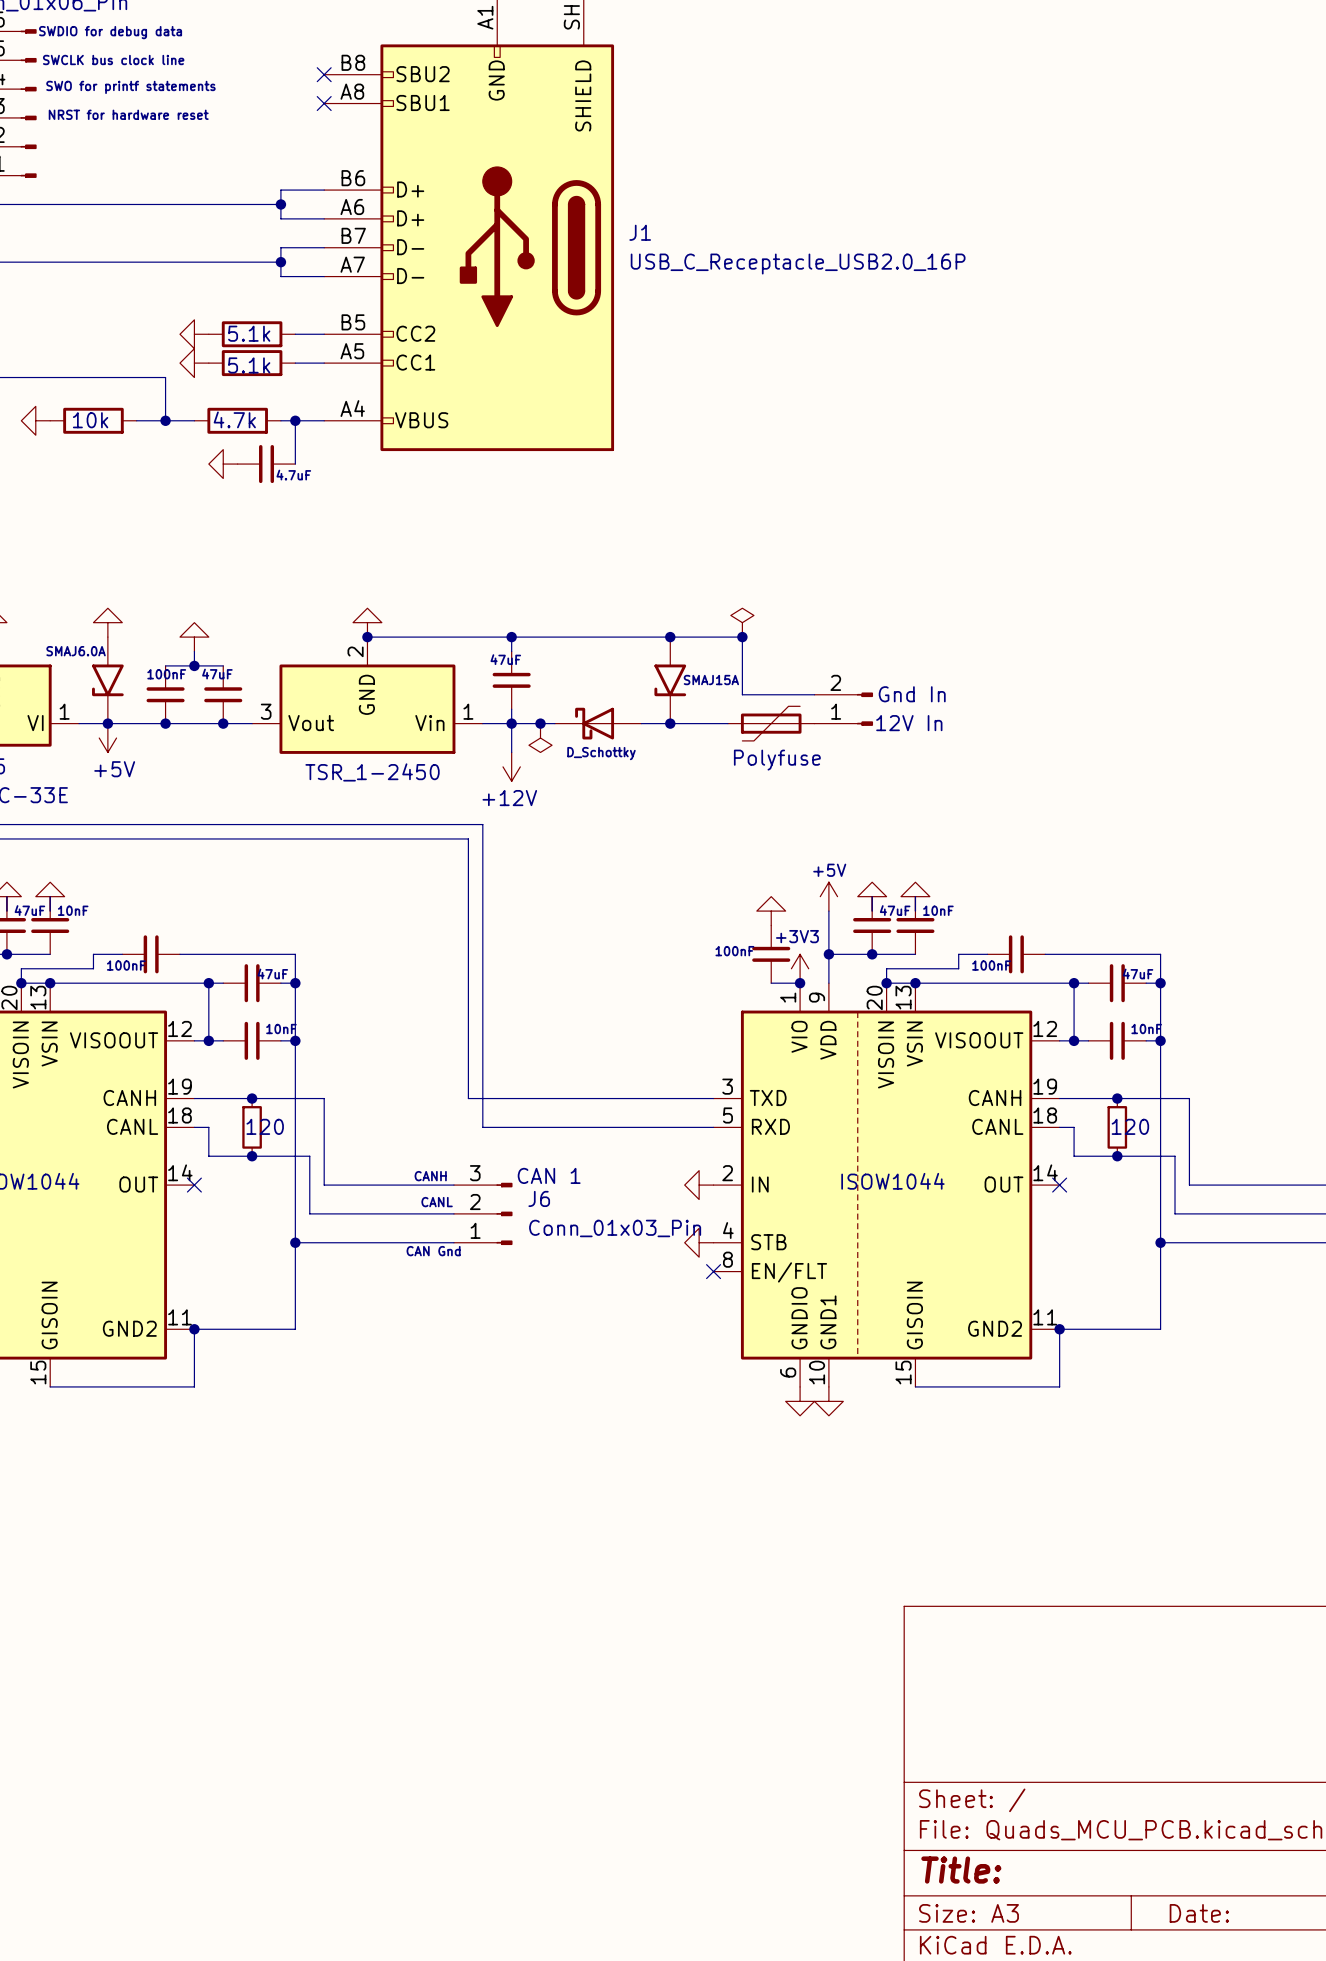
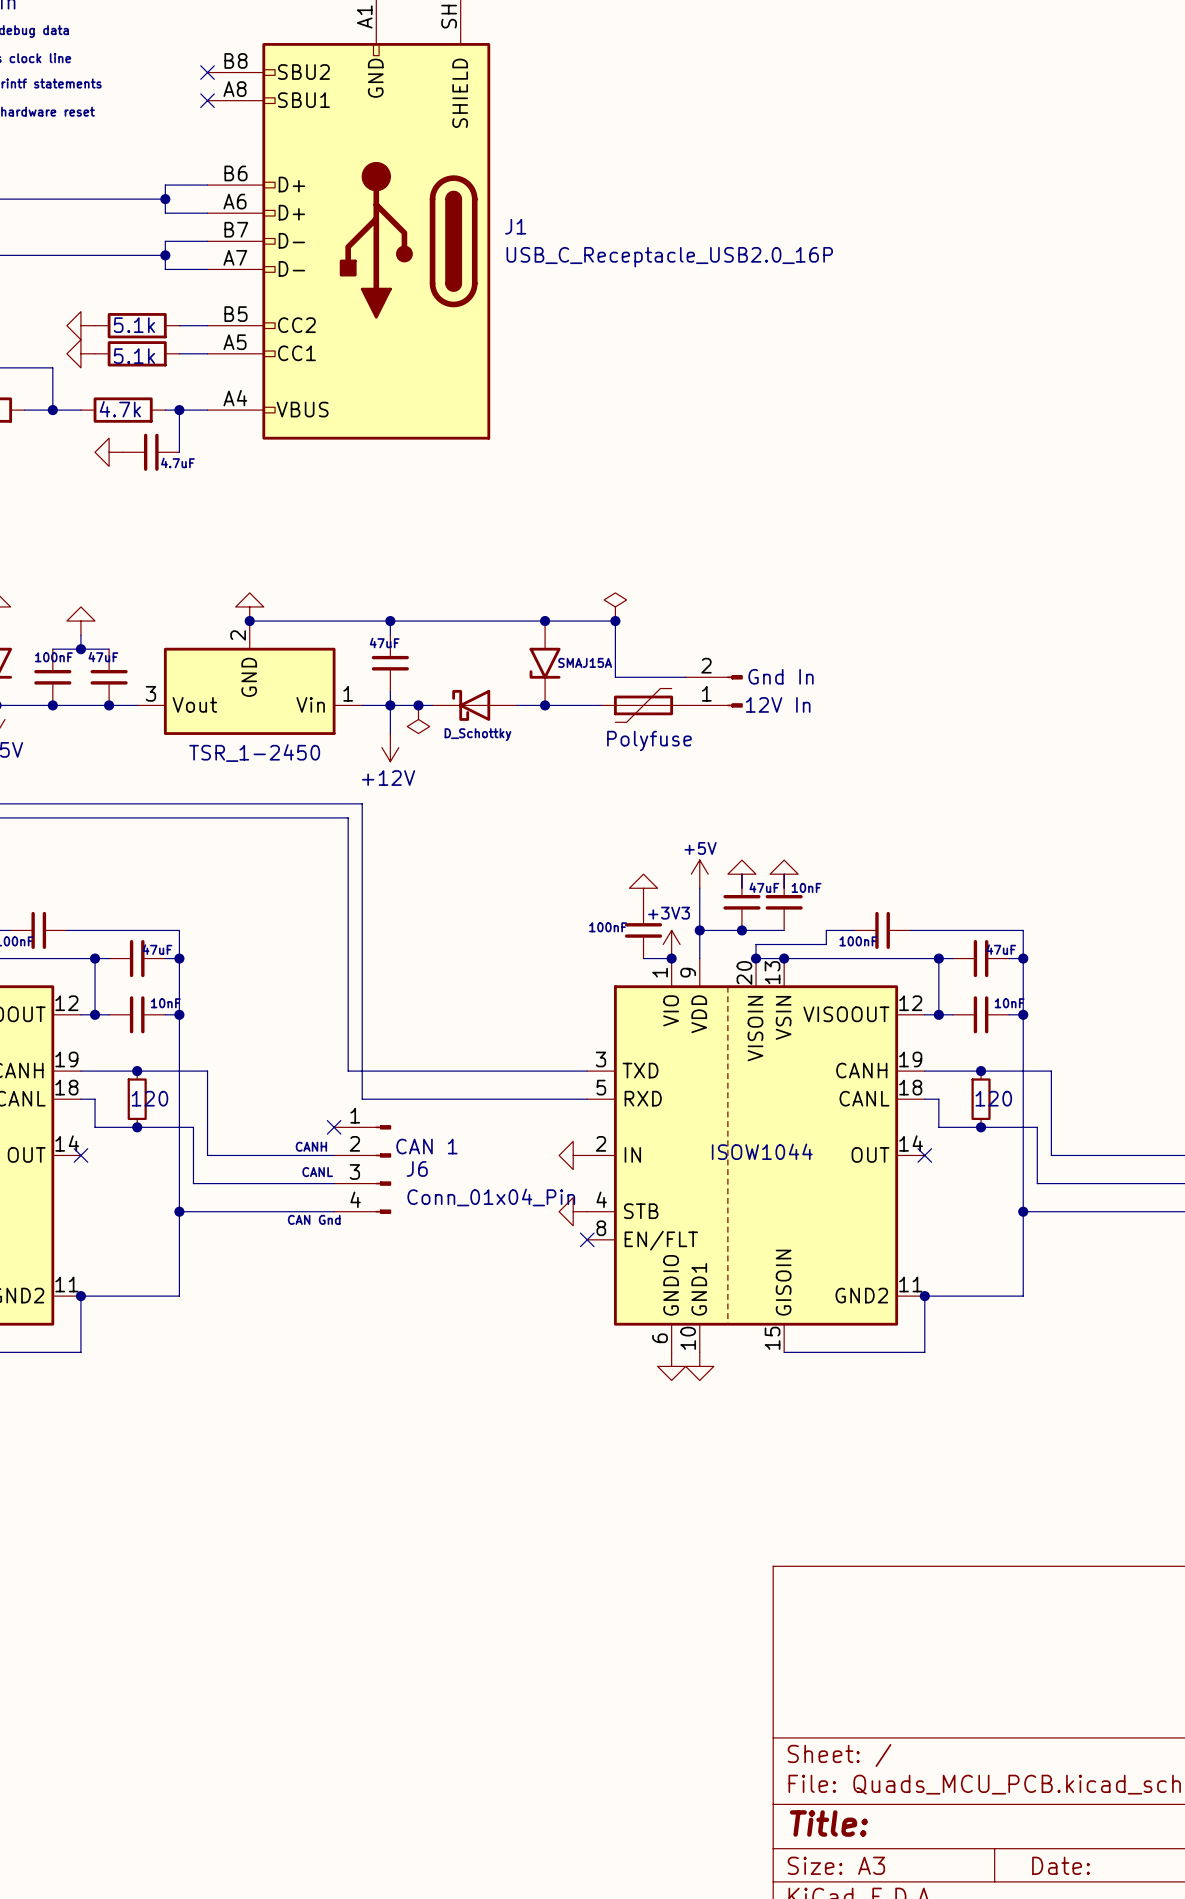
no-connect mark: none -> (334, 1127)
J6 symbol: [453, 1182, 513, 1246] -> [334, 1125, 392, 1214]
J6 value: Conn_01x03_Pin (615, 1228) -> Conn_01x04_Pin (491, 1197)

